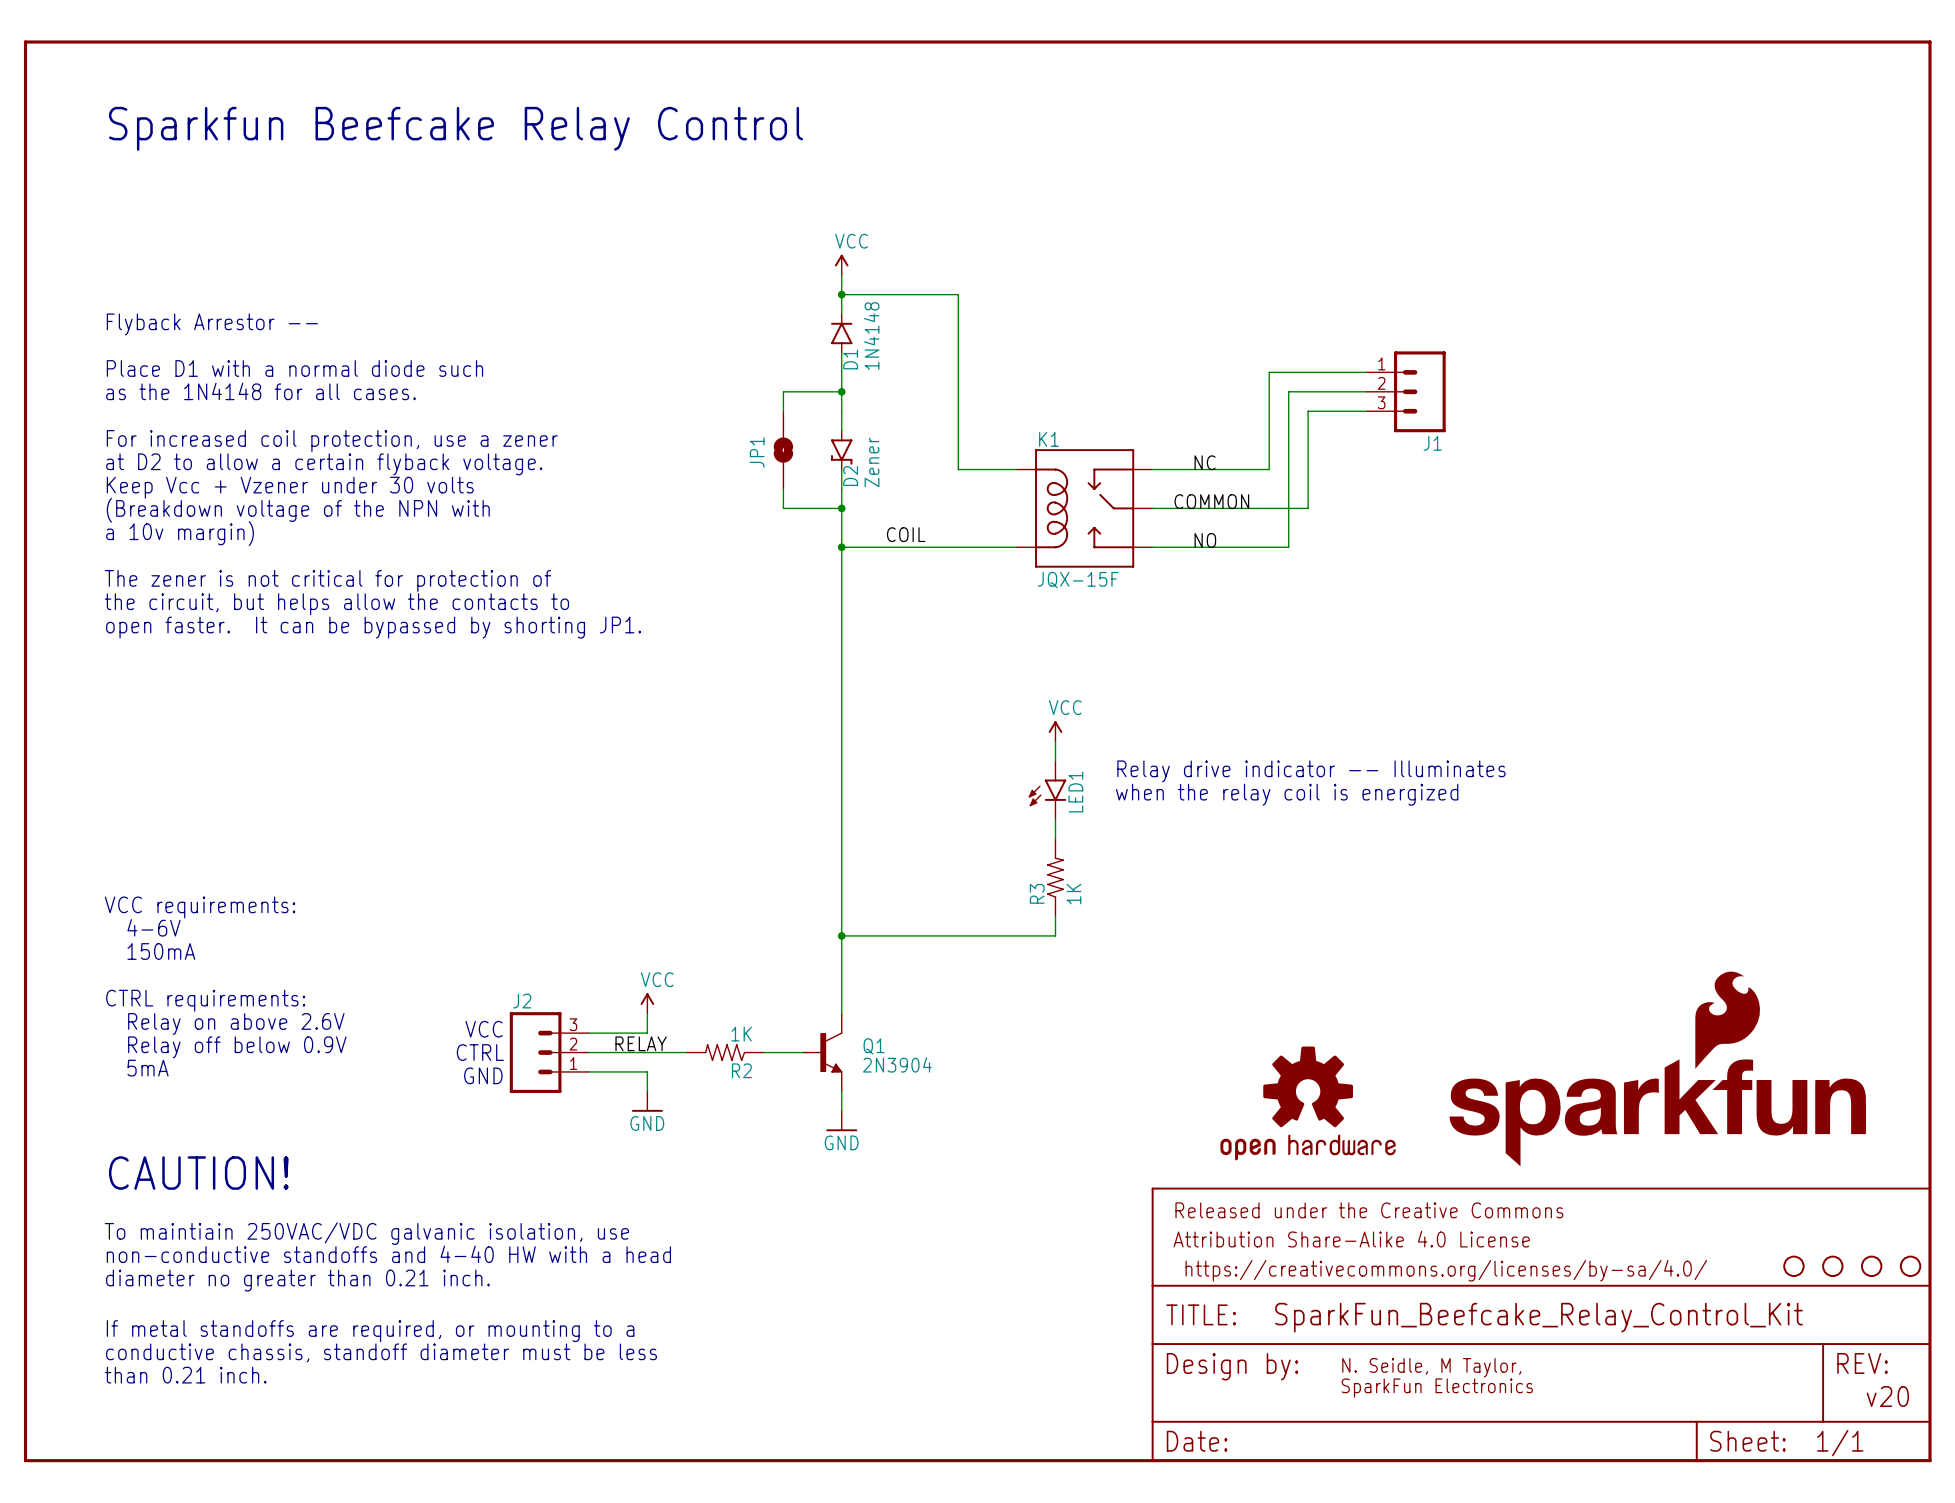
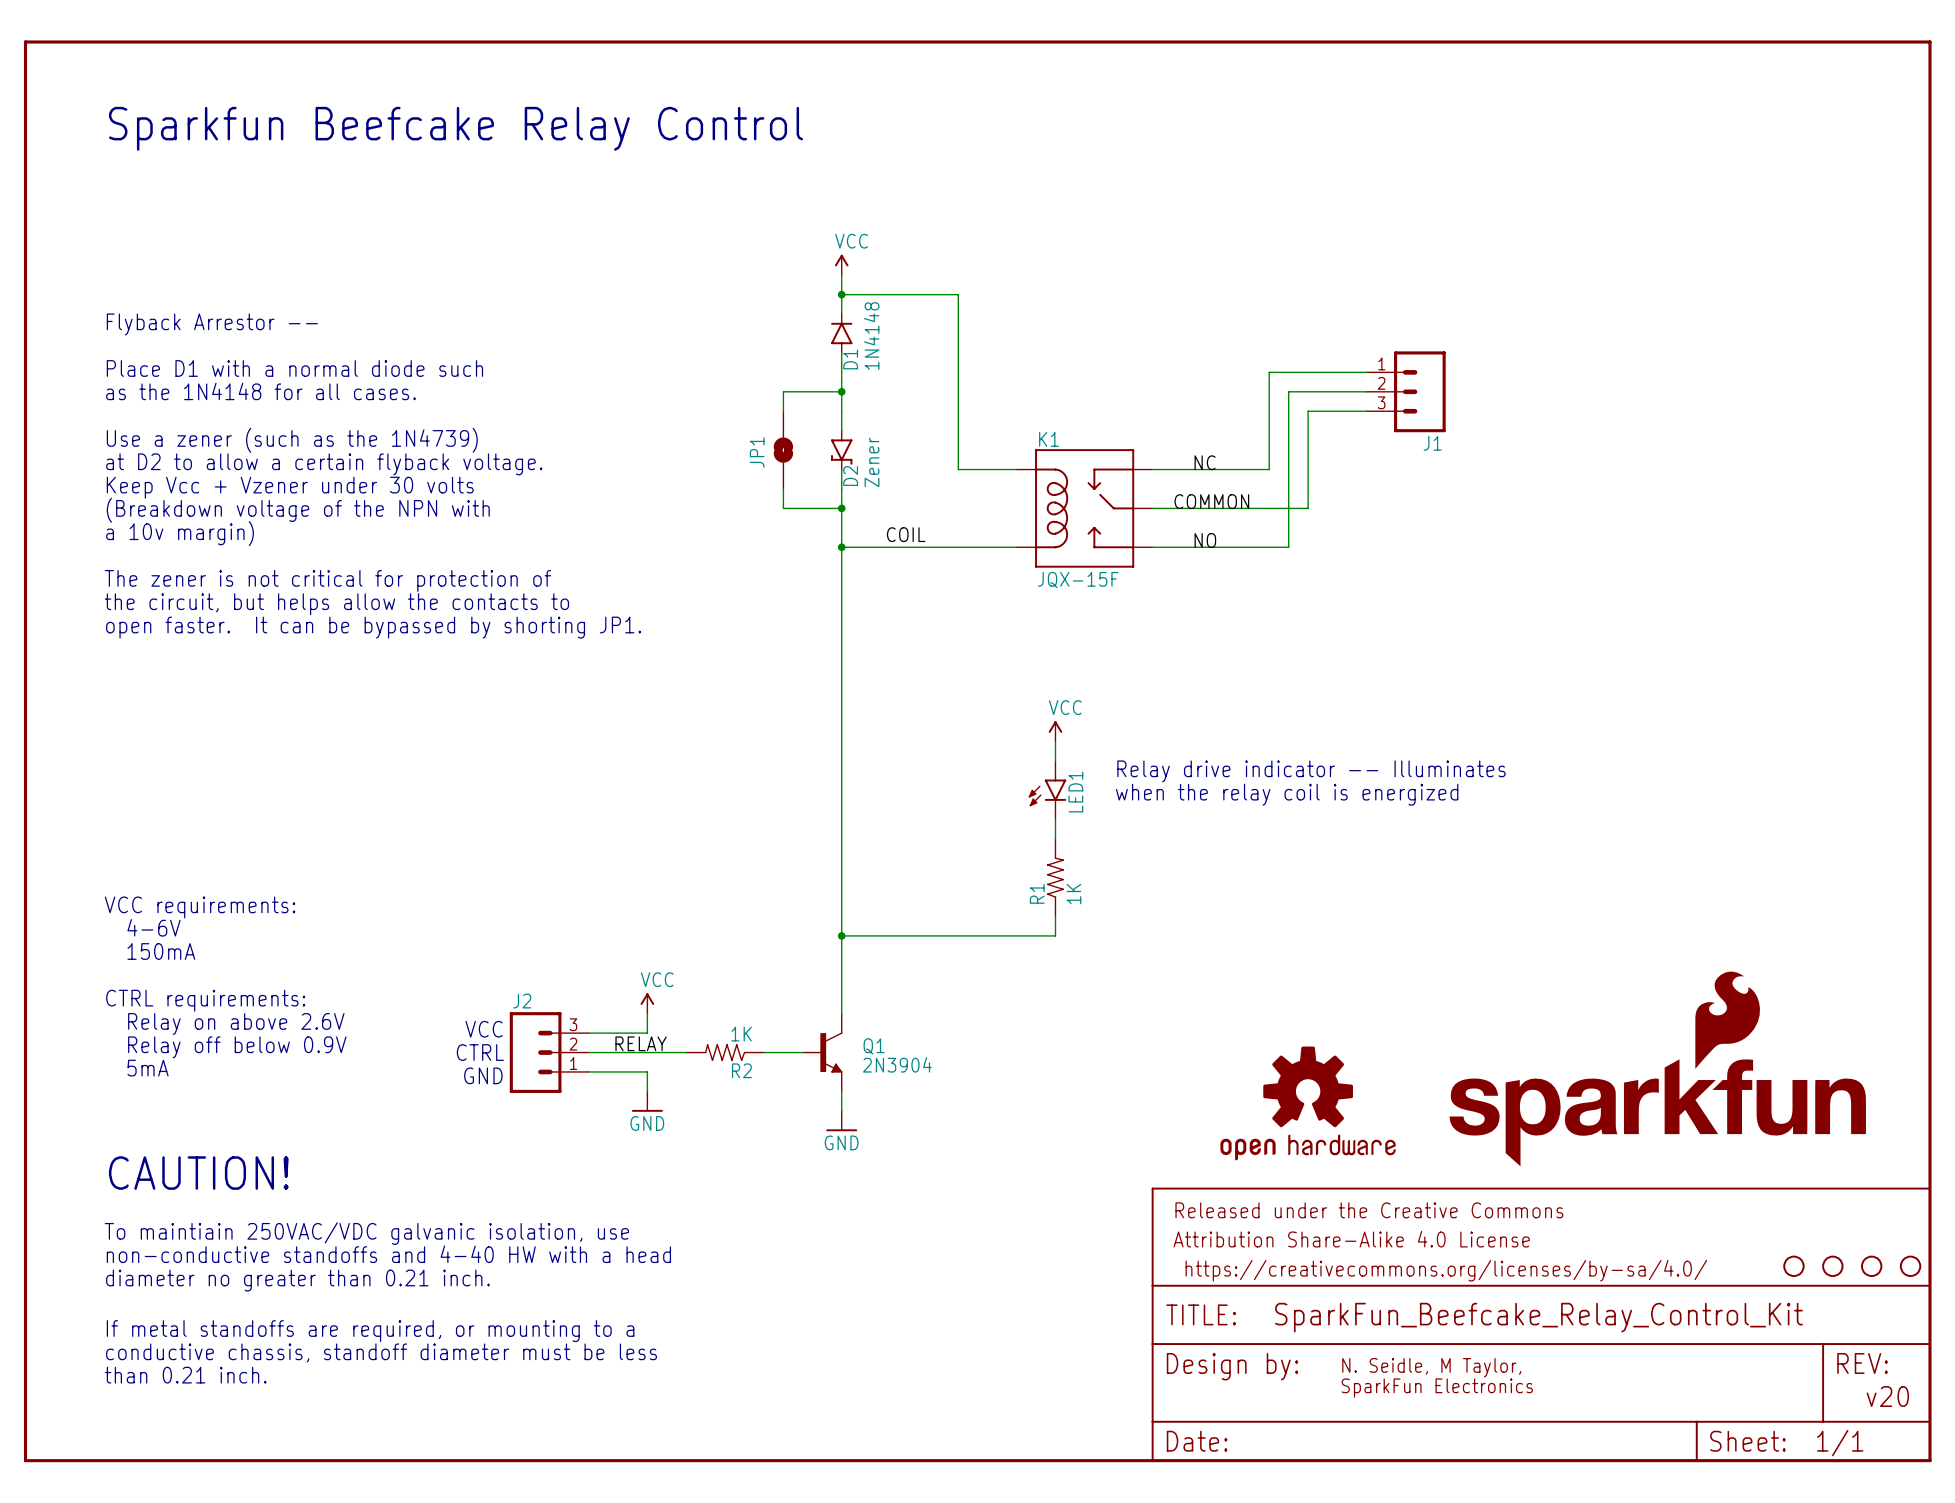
text: For increased coil protection, use a zener (332, 441) -> Use a zener (such as the 1N4739) (292, 440)
R3 name: R3 (1037, 893) -> R1 (1037, 893)

